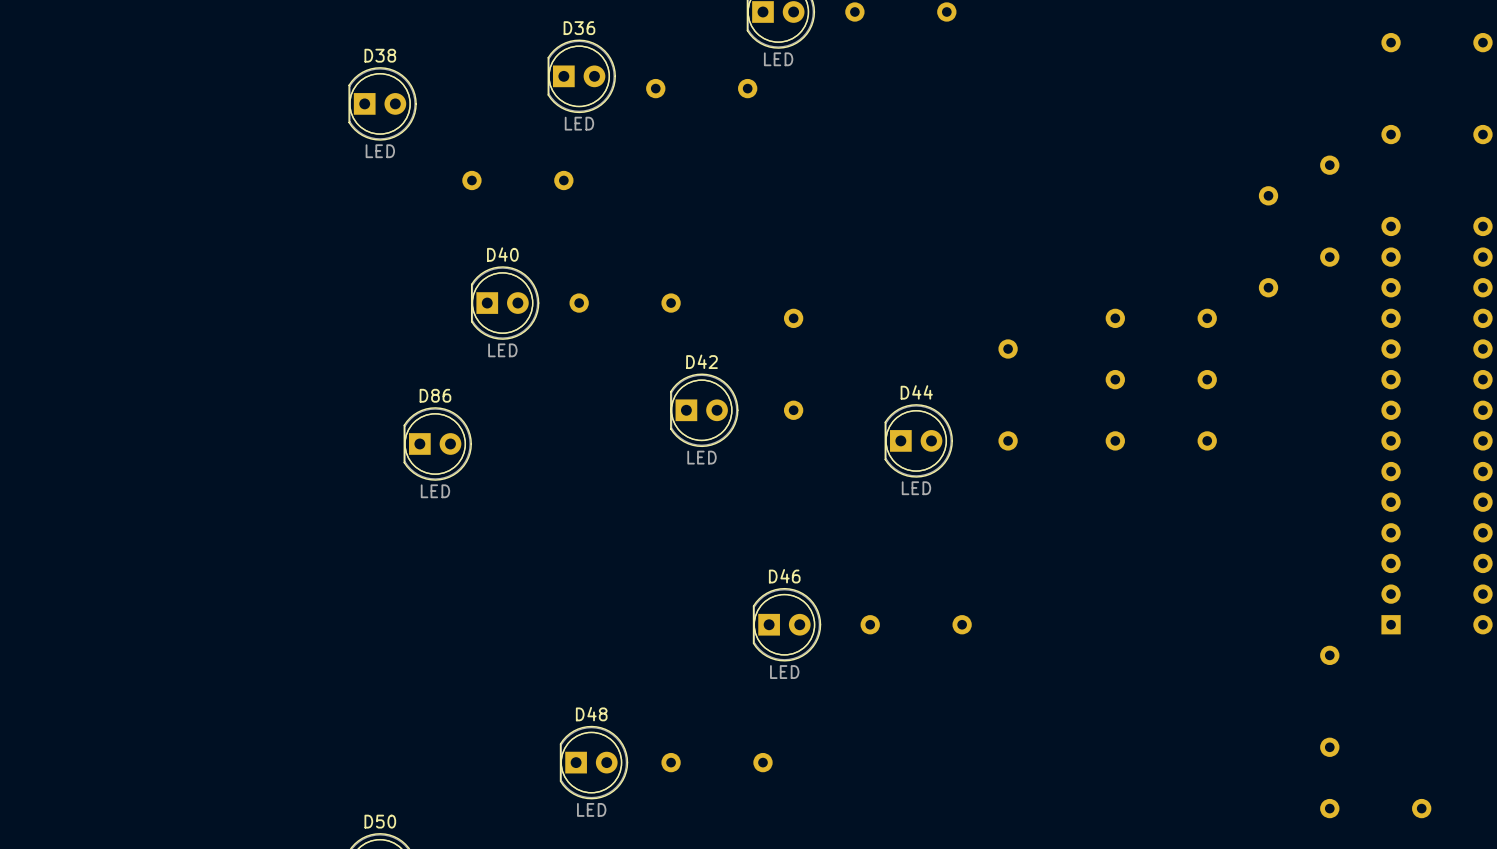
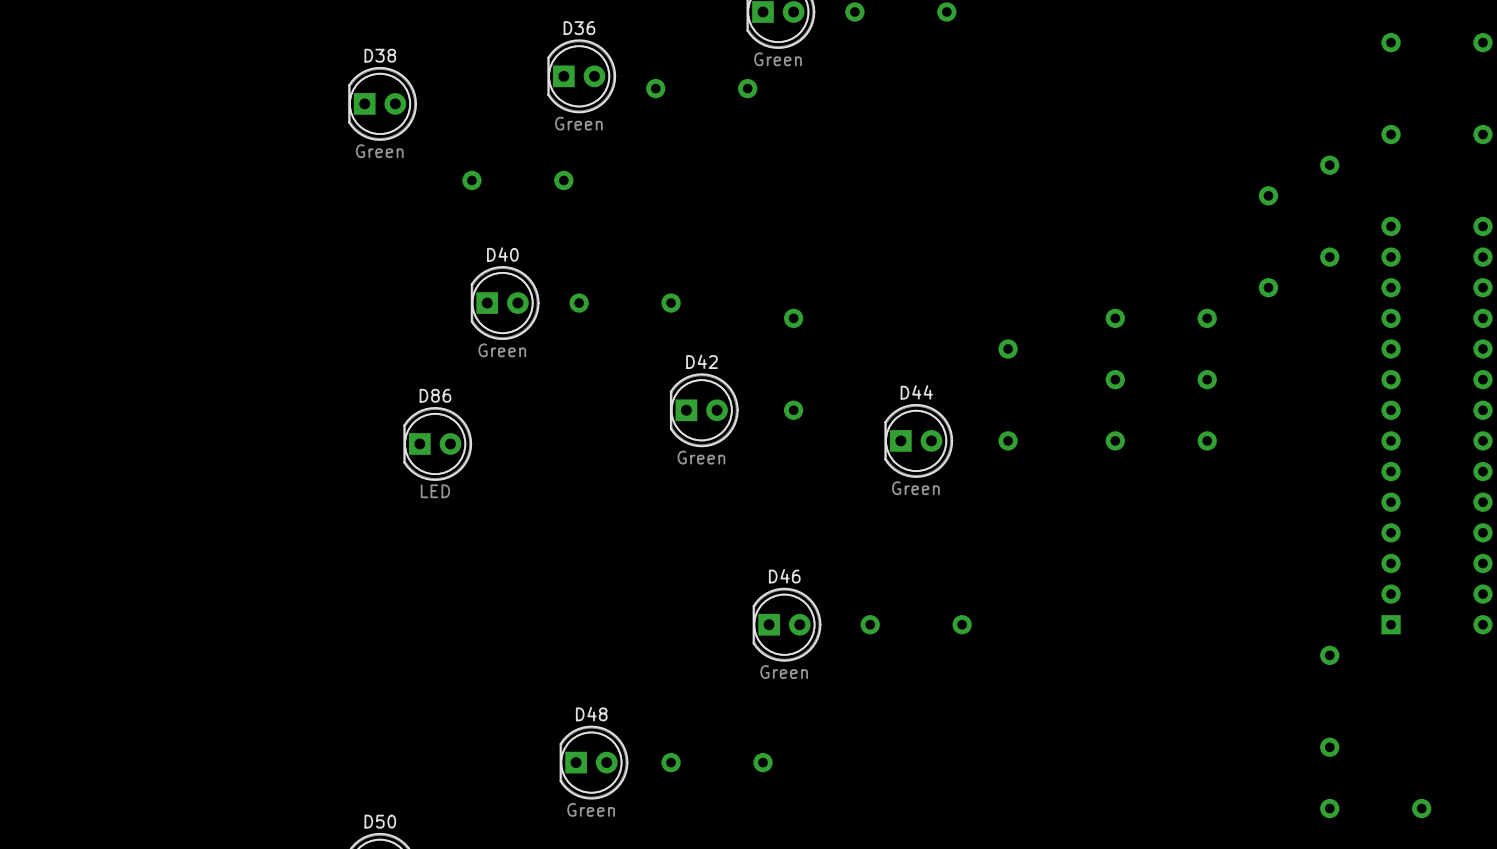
part value: LED (778, 59) -> Green (778, 59)
D36 value: LED (579, 123) -> Green (578, 123)
D38 value: LED (380, 151) -> Green (379, 151)
D40 value: LED (502, 350) -> Green (502, 350)
D42 value: LED (702, 457) -> Green (701, 457)
D44 value: LED (916, 488) -> Green (915, 488)
D46 value: LED (784, 672) -> Green (784, 672)
D48 value: LED (591, 809) -> Green (591, 809)

